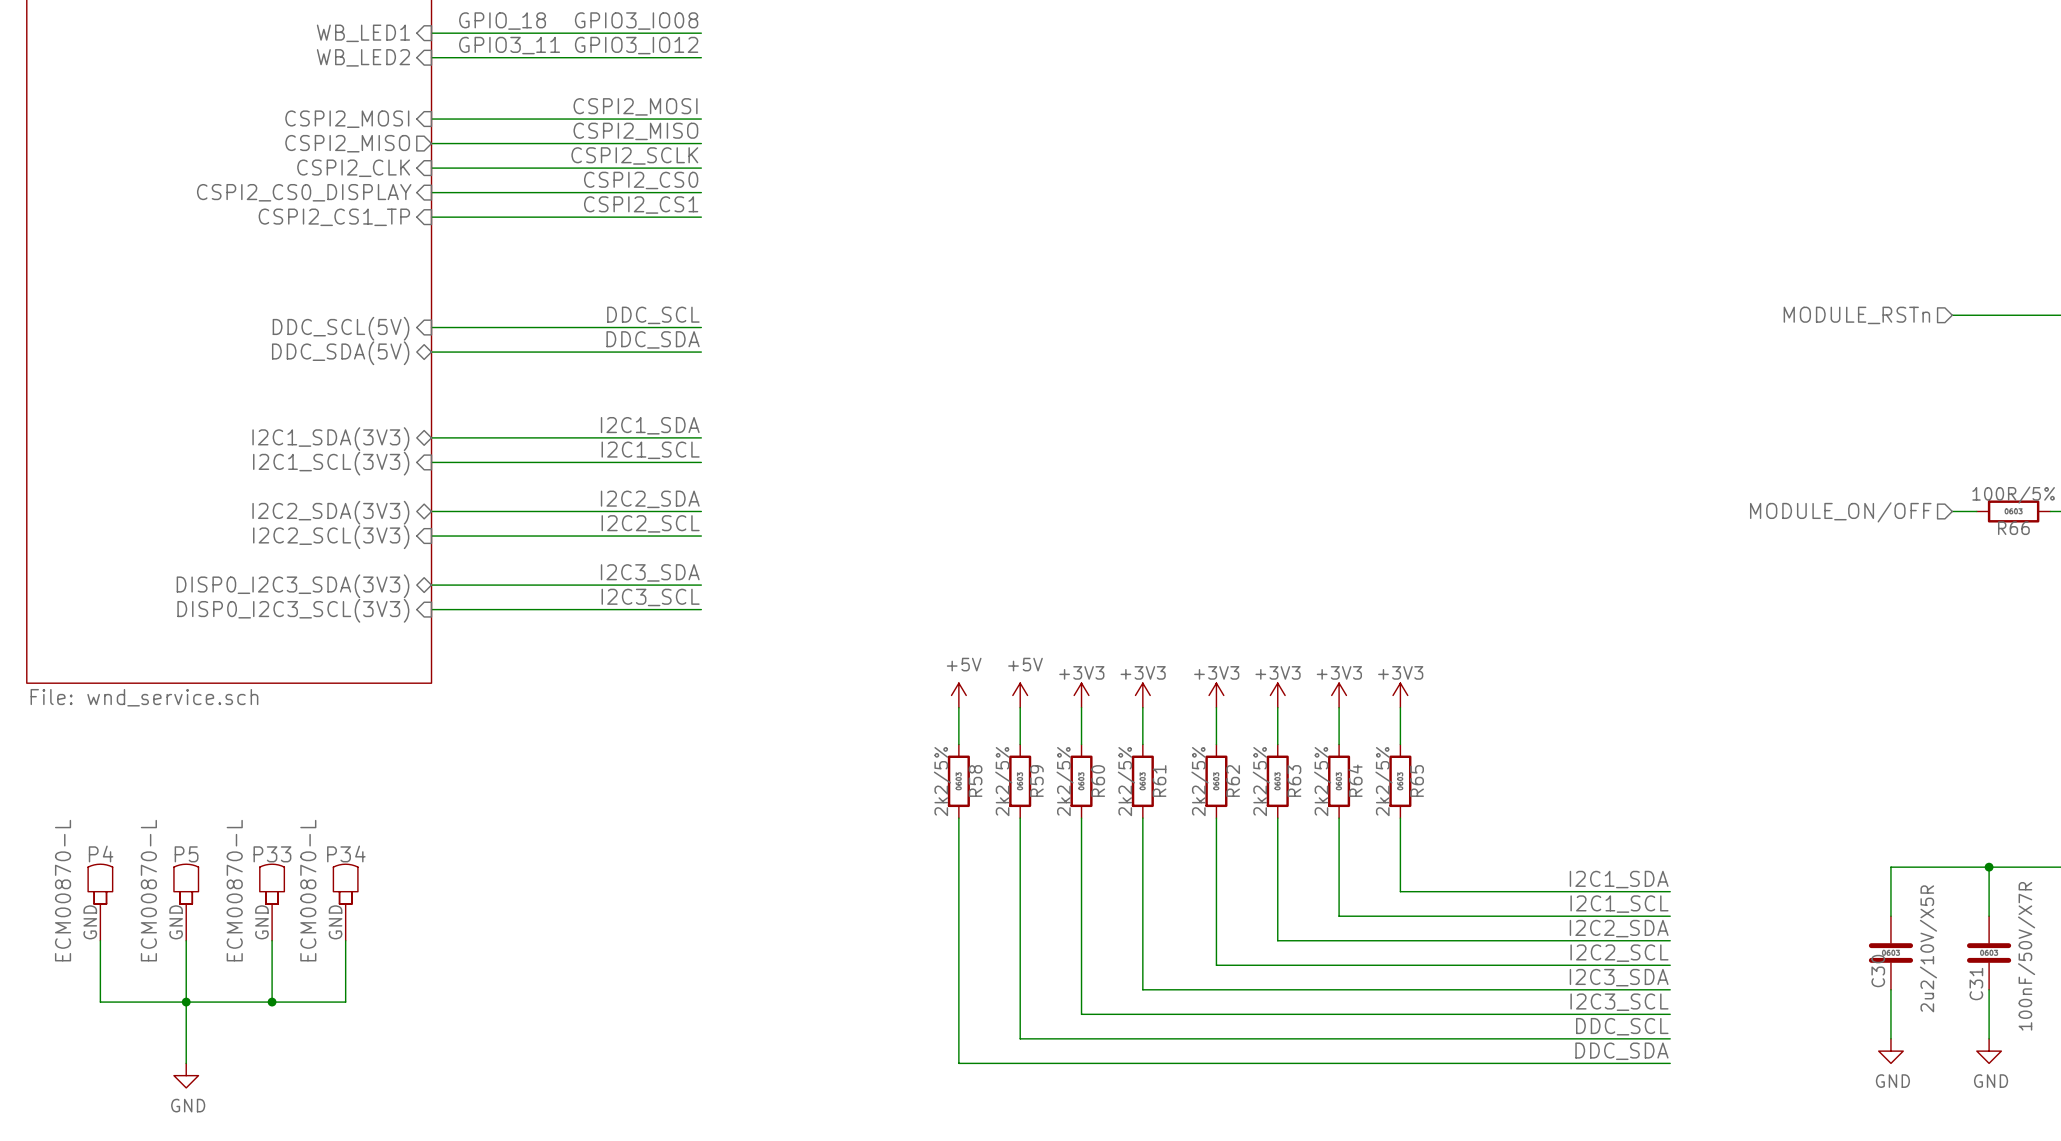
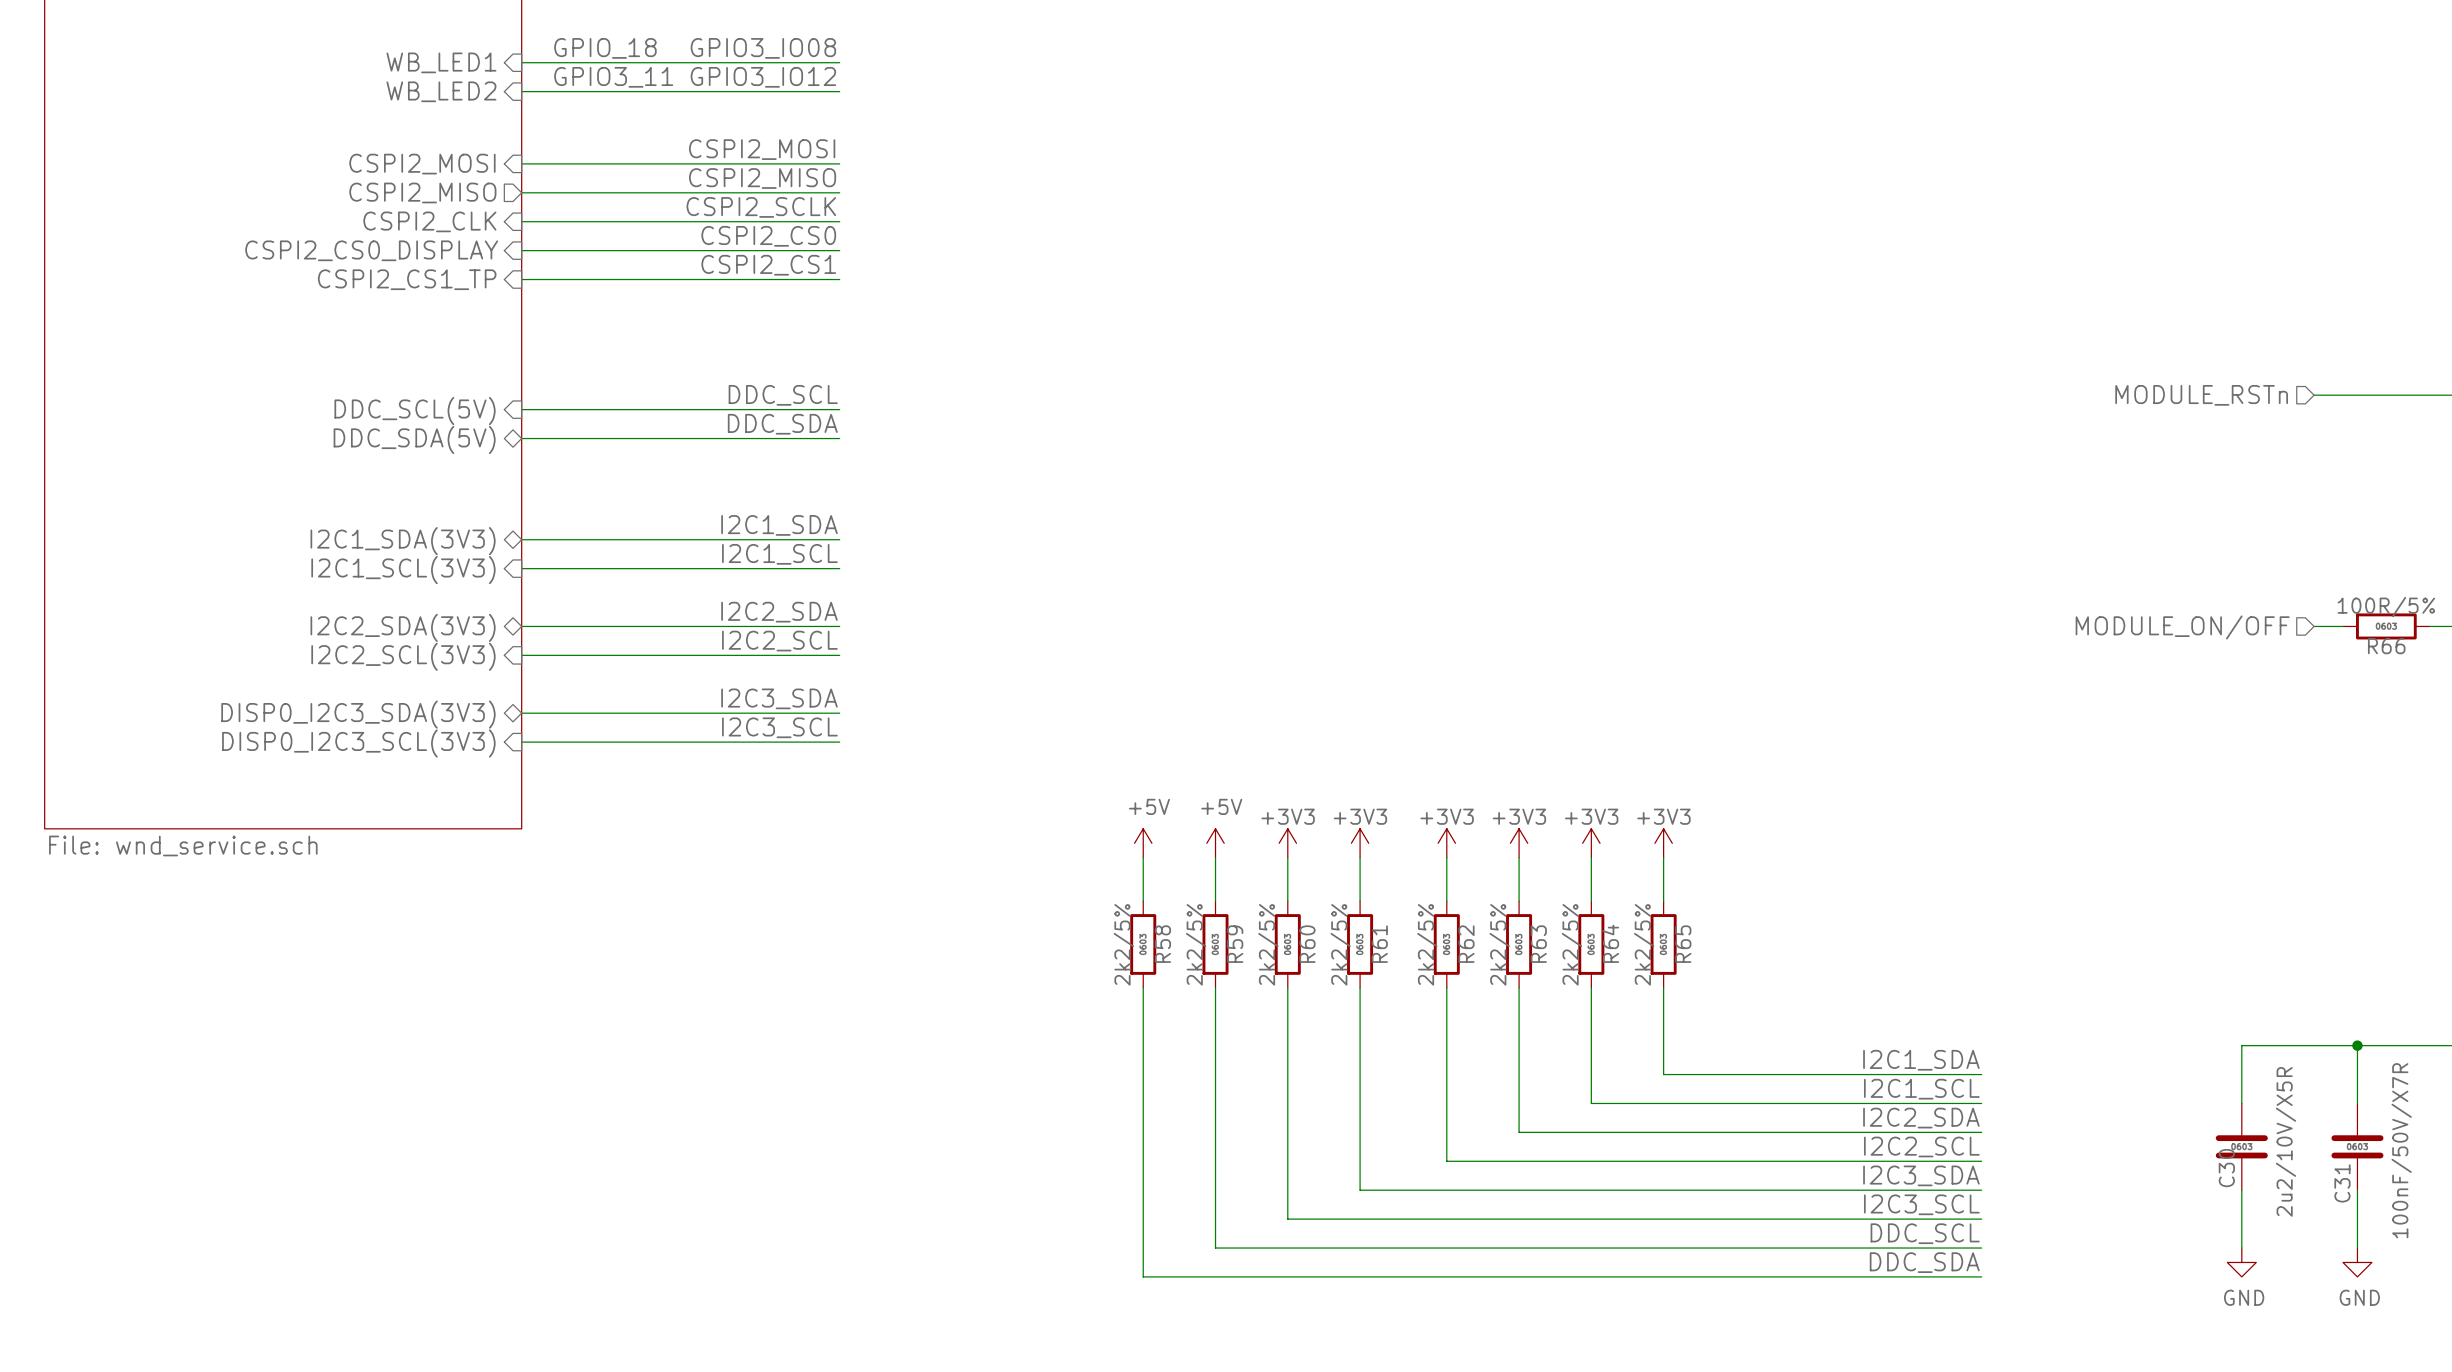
P4: ECM00870-L (100, 902) -> none
P5: ECM00870-L (186, 902) -> none
P33: ECM00870-L (272, 902) -> none
P34: ECM00870-L (345, 902) -> none
wire: (100, 940) (100, 1002) (345, 1002) (345, 940) -> none
wire: (186, 940) (186, 1063) -> none
wire: (272, 940) (272, 1002) -> none
junction: (186, 1002) -> none
junction: (272, 1002) -> none
power symbol: GND (186, 1075) -> none

